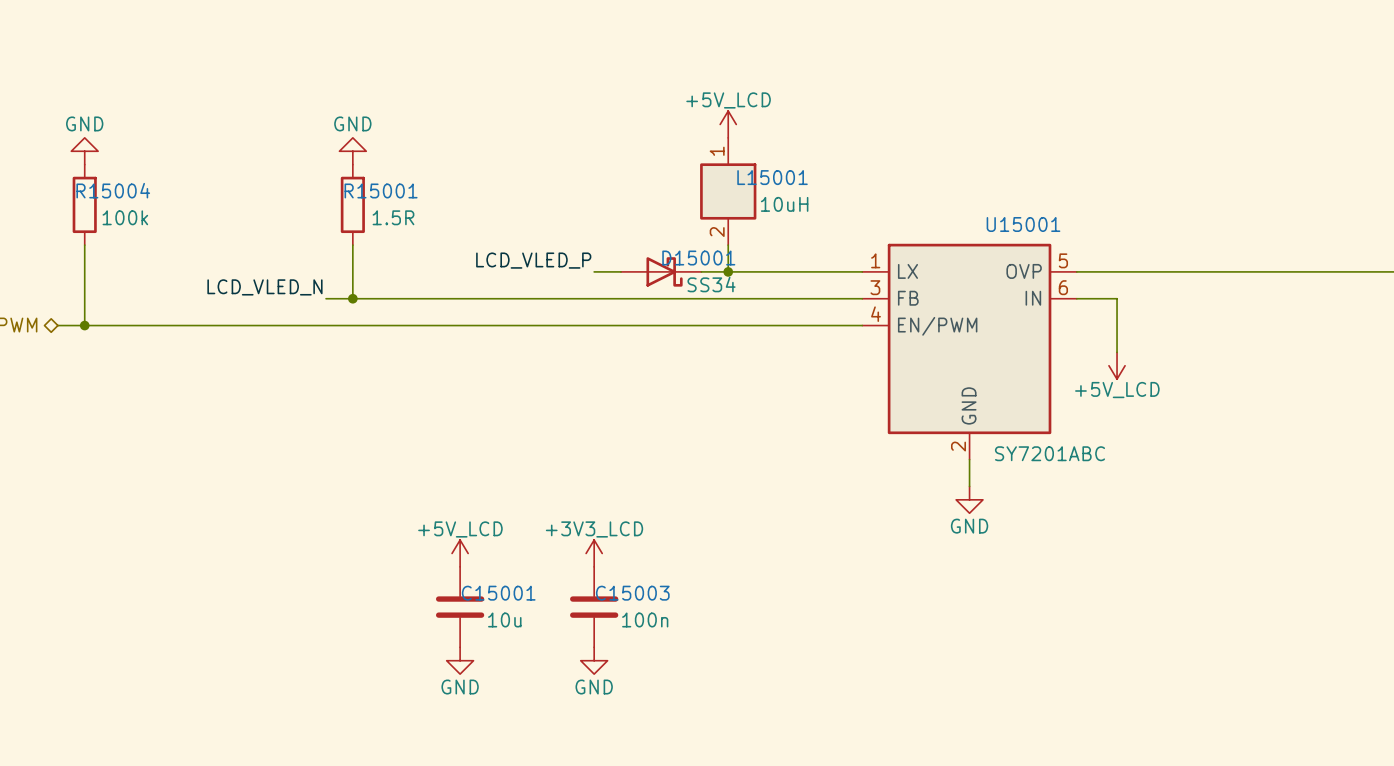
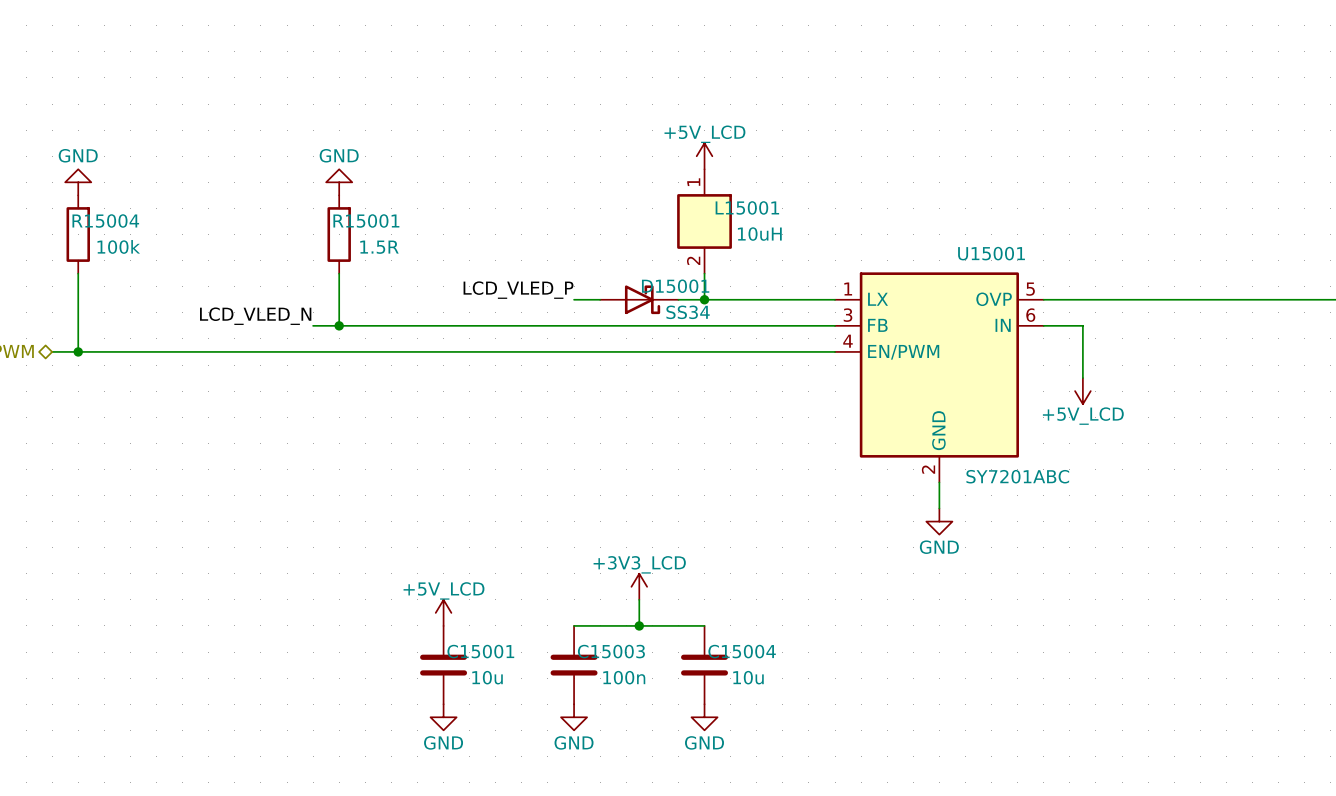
power symbol position: +5V_LCD (460, 553) -> +5V_LCD (443, 612)
power symbol position: +3V3_LCD (594, 553) -> +3V3_LCD (639, 586)
wire: none -> (639, 599) (639, 625)
C15001 position: (460, 607) -> (443, 665)
wire: none -> (574, 625) (704, 625)
C15003 position: (594, 607) -> (574, 665)
junction: none -> (639, 625)
C15004: none -> 10u (704, 665)
power symbol position: GND (460, 660) -> GND (443, 717)
power symbol position: GND (594, 660) -> GND (574, 717)
power symbol: none -> GND (704, 717)

